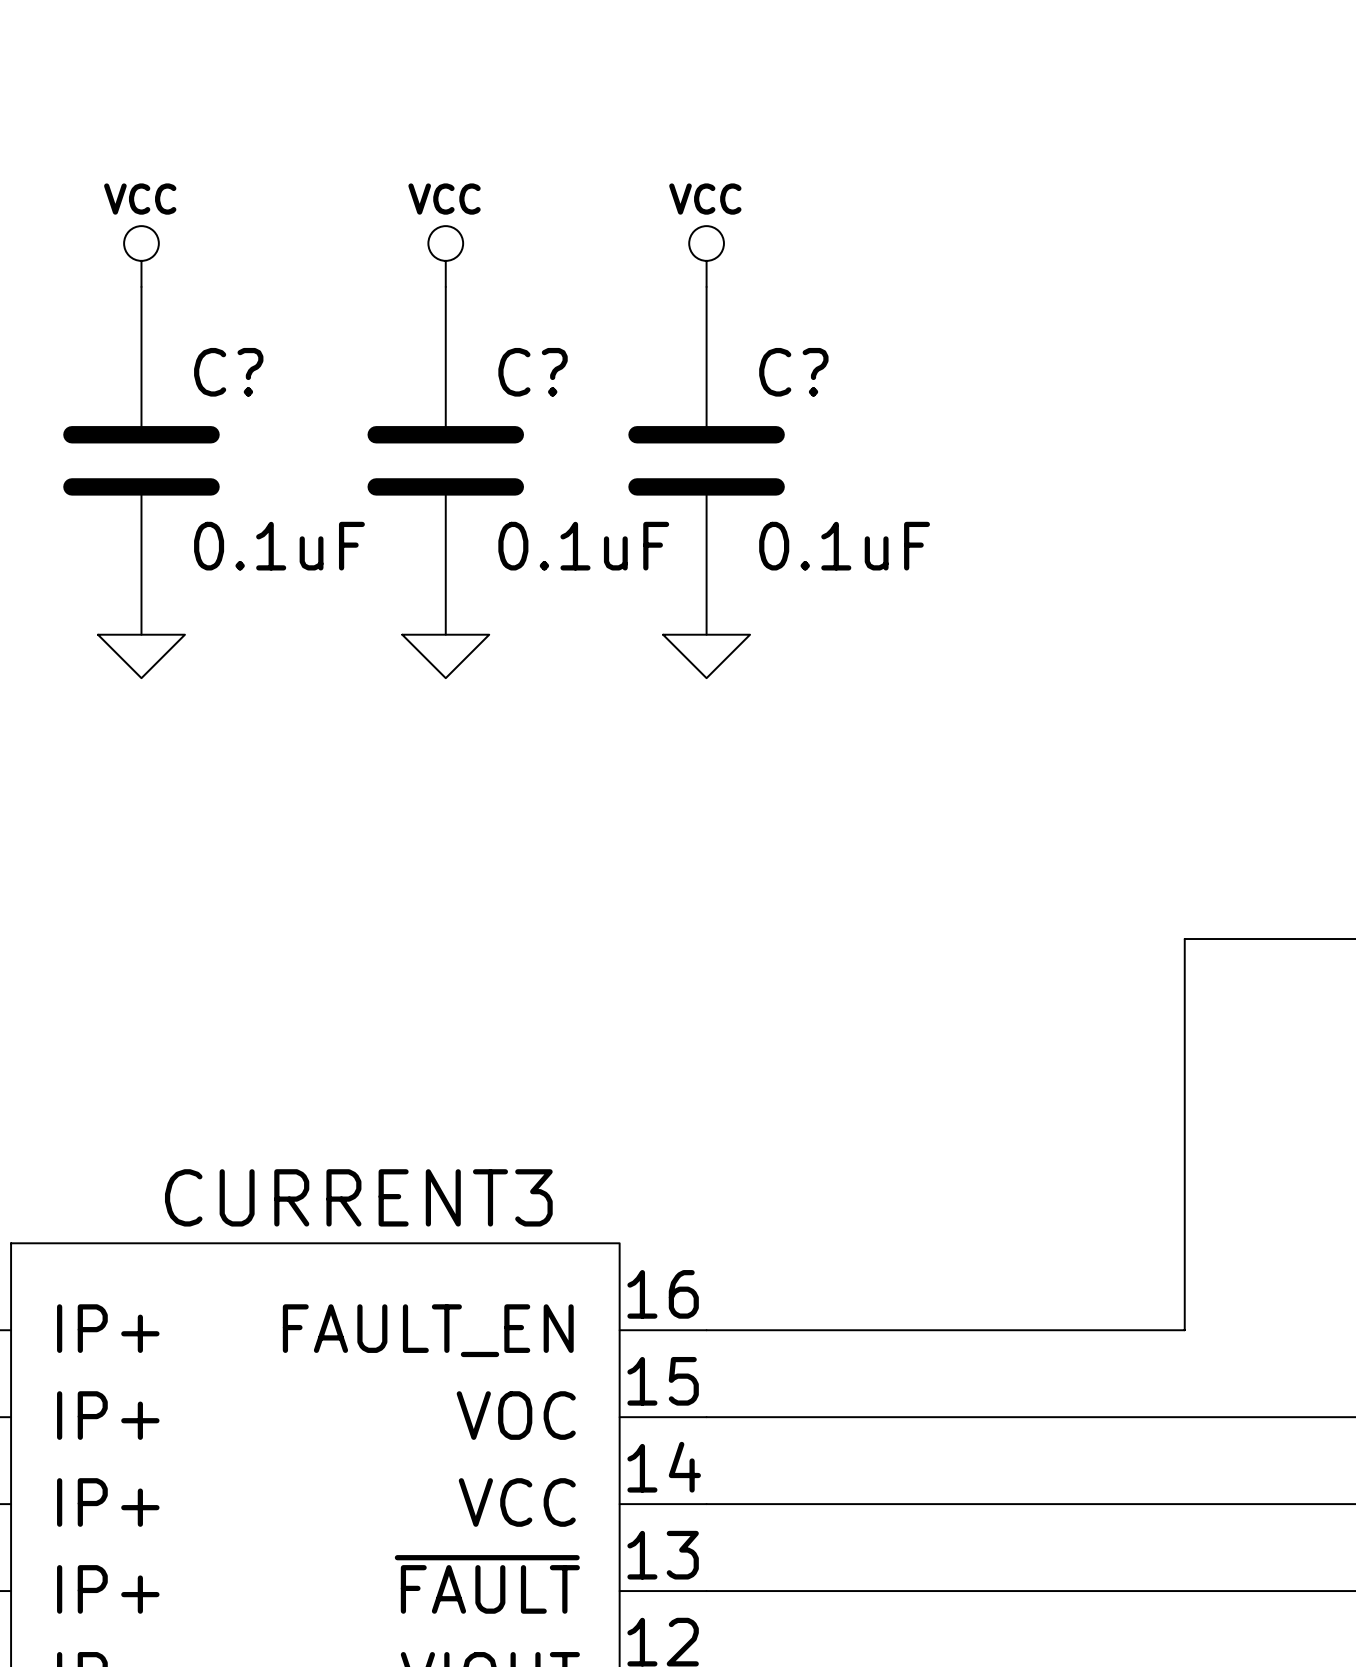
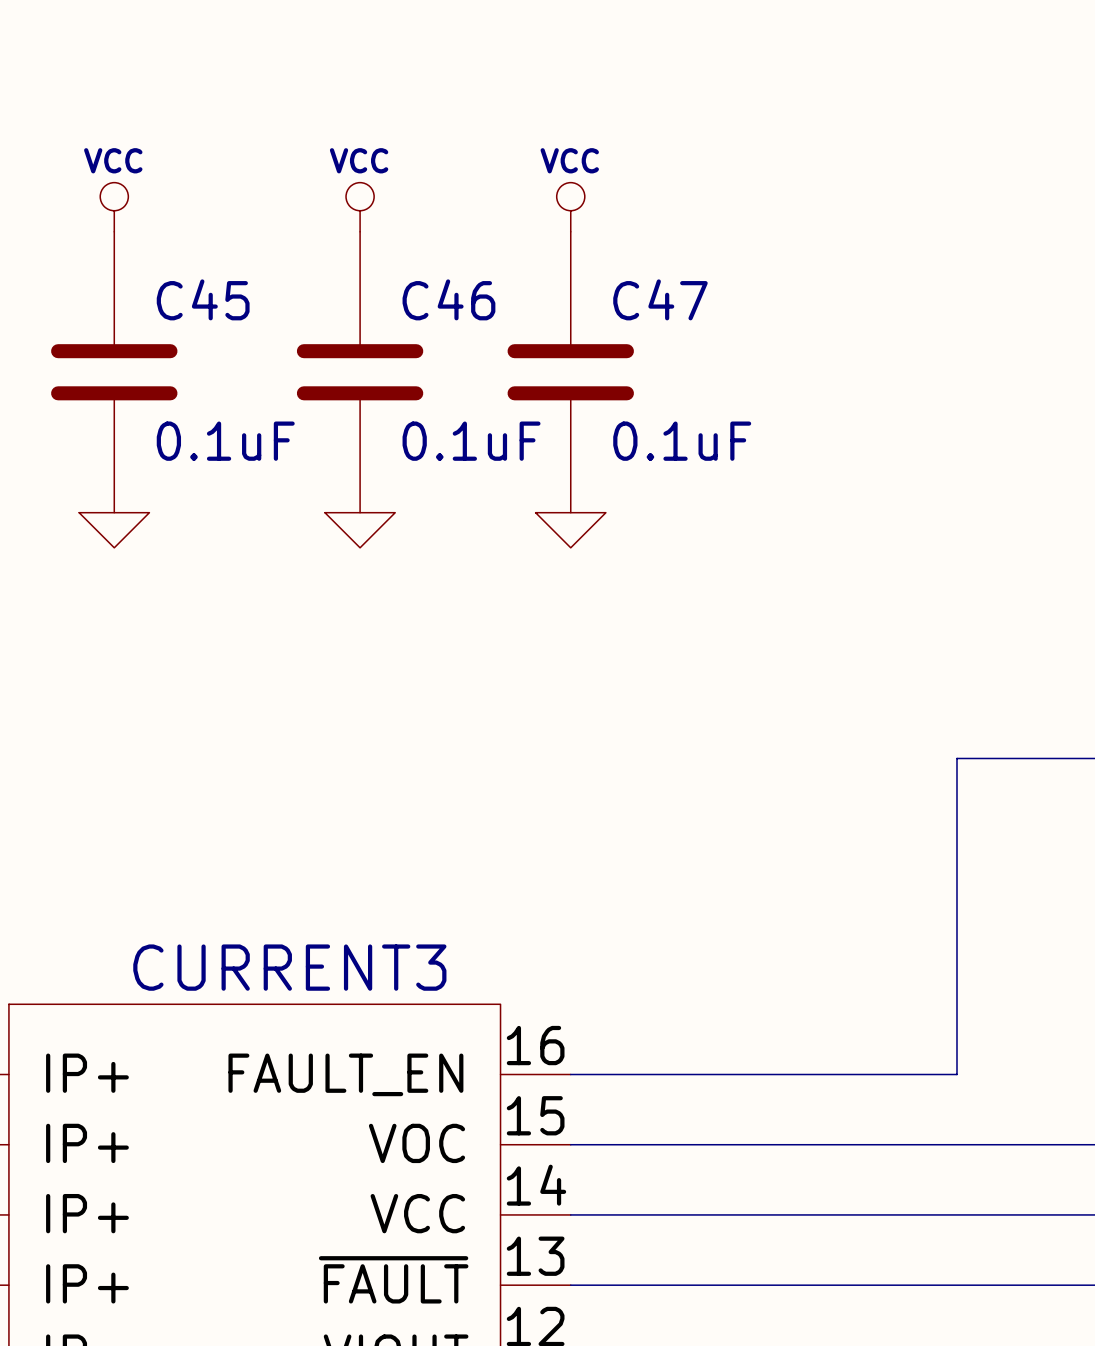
C? name: C? (228, 372) -> C45 (203, 299)
C? name: C? (533, 372) -> C46 (448, 299)
C? name: C? (793, 372) -> C47 (660, 299)

